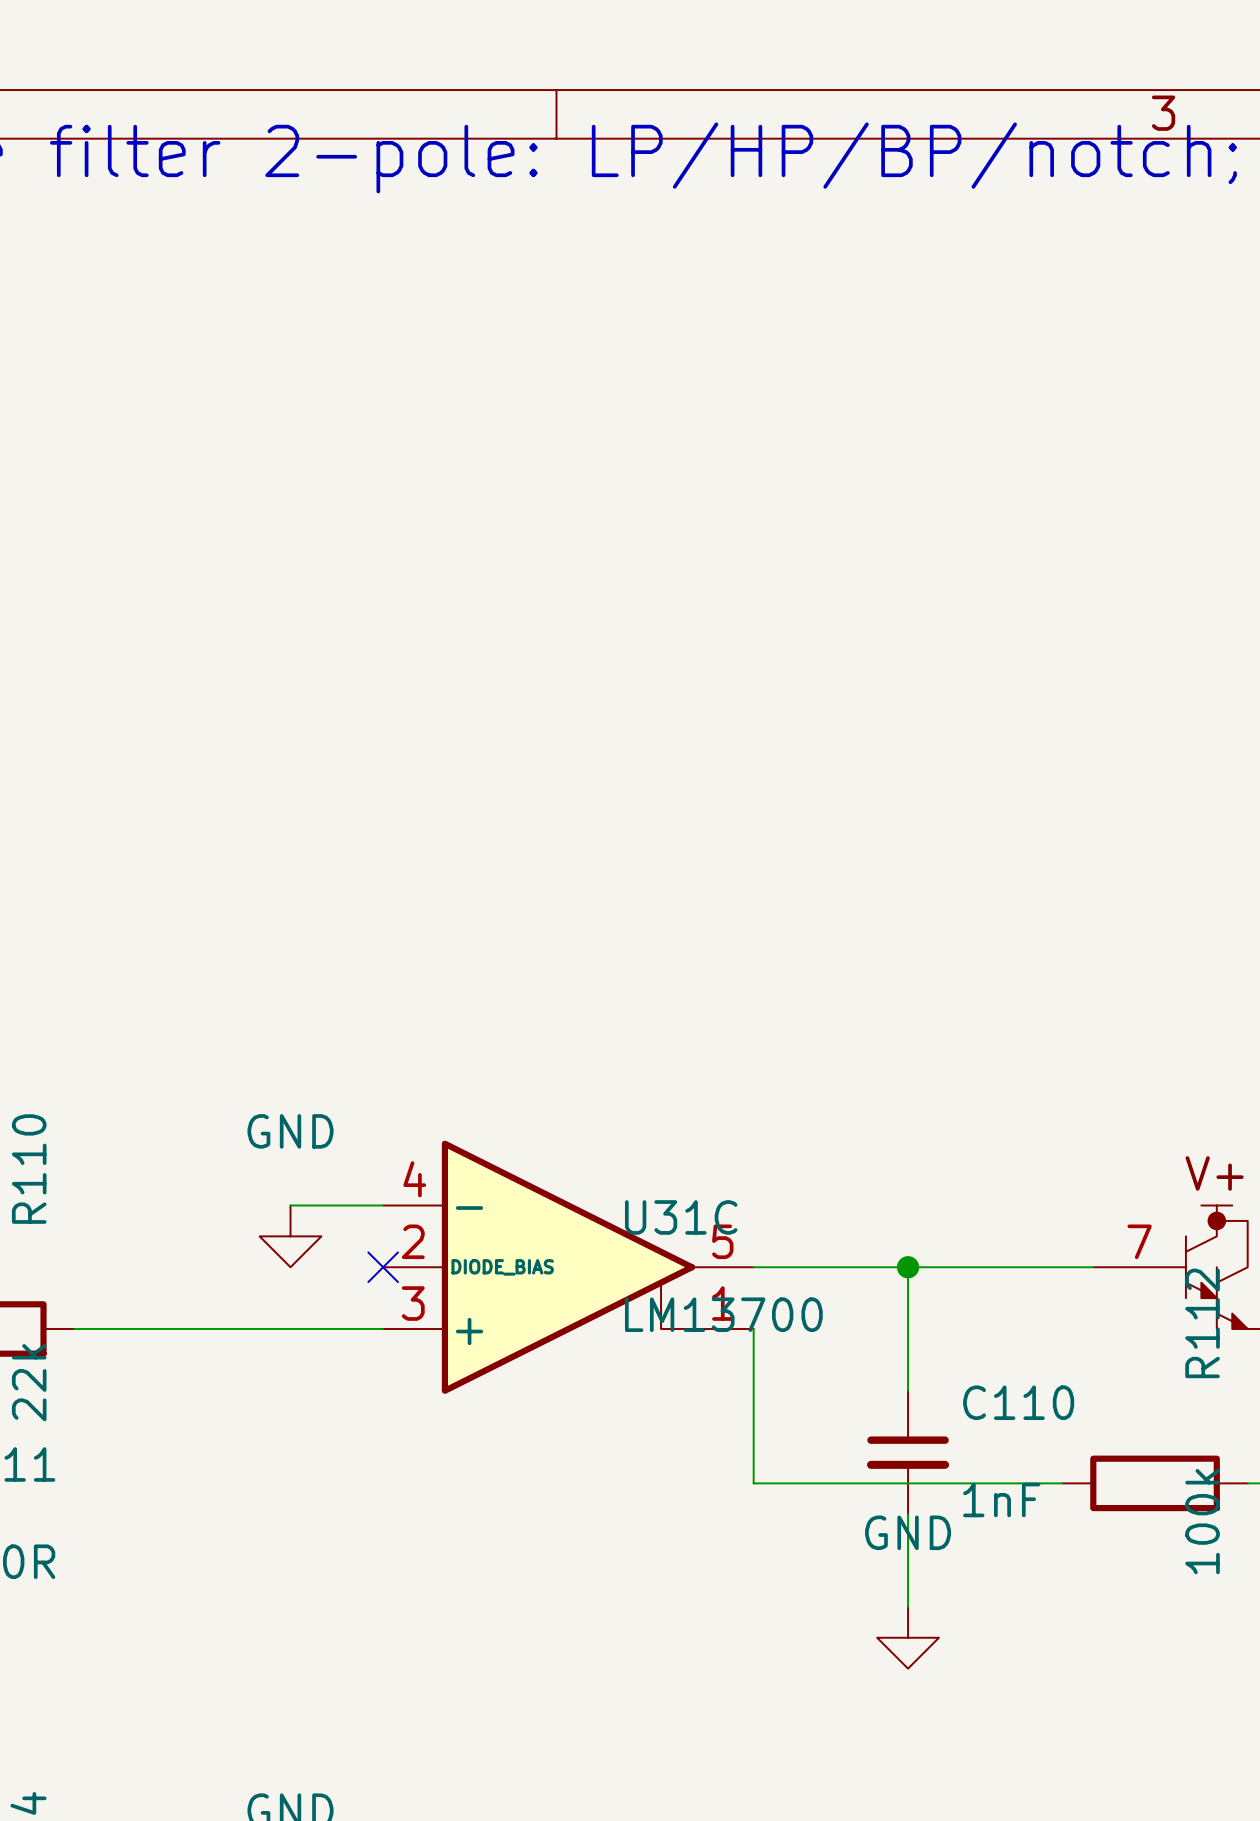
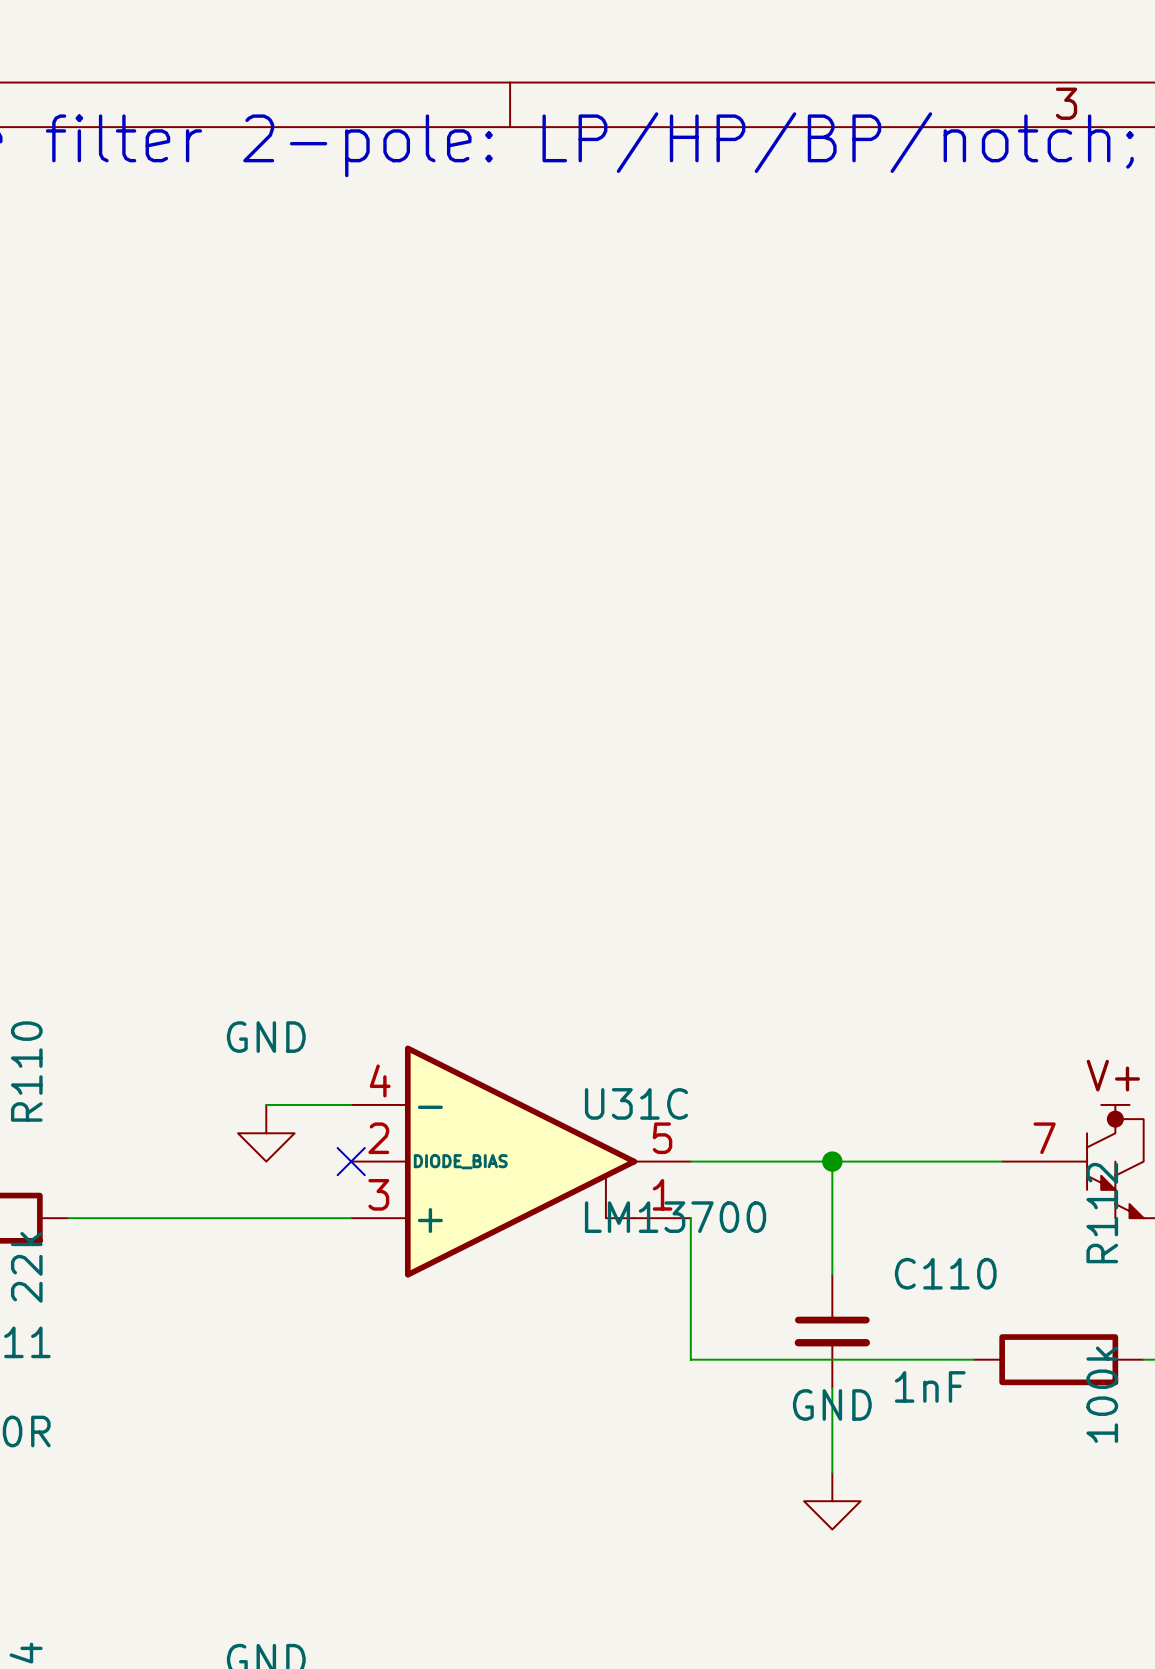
U31C name position: U31C (681, 1217) -> U31C (636, 1103)
U31C value position: LM13700 (723, 1314) -> LM13700 (675, 1217)
C110 name position: C110 (1018, 1402) -> C110 (945, 1273)
C110 value position: 1nF (1001, 1499) -> 1nF (930, 1386)

